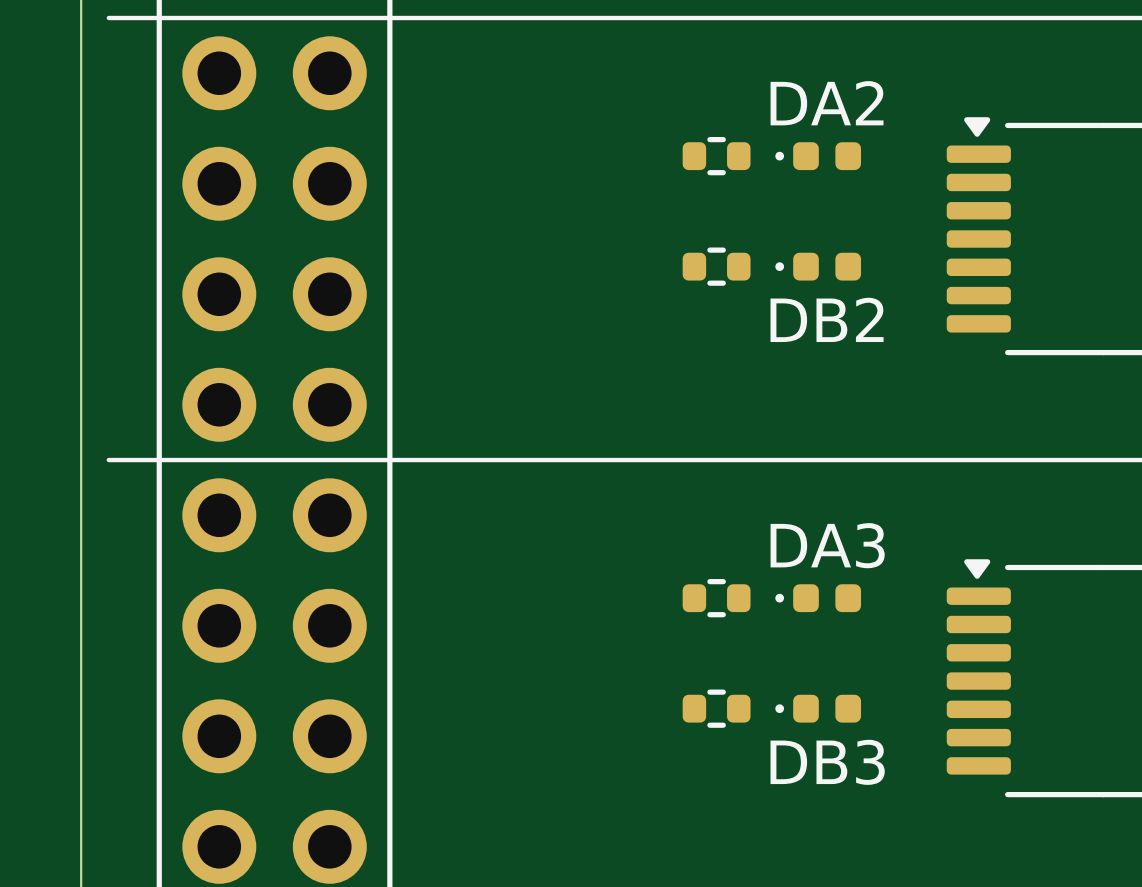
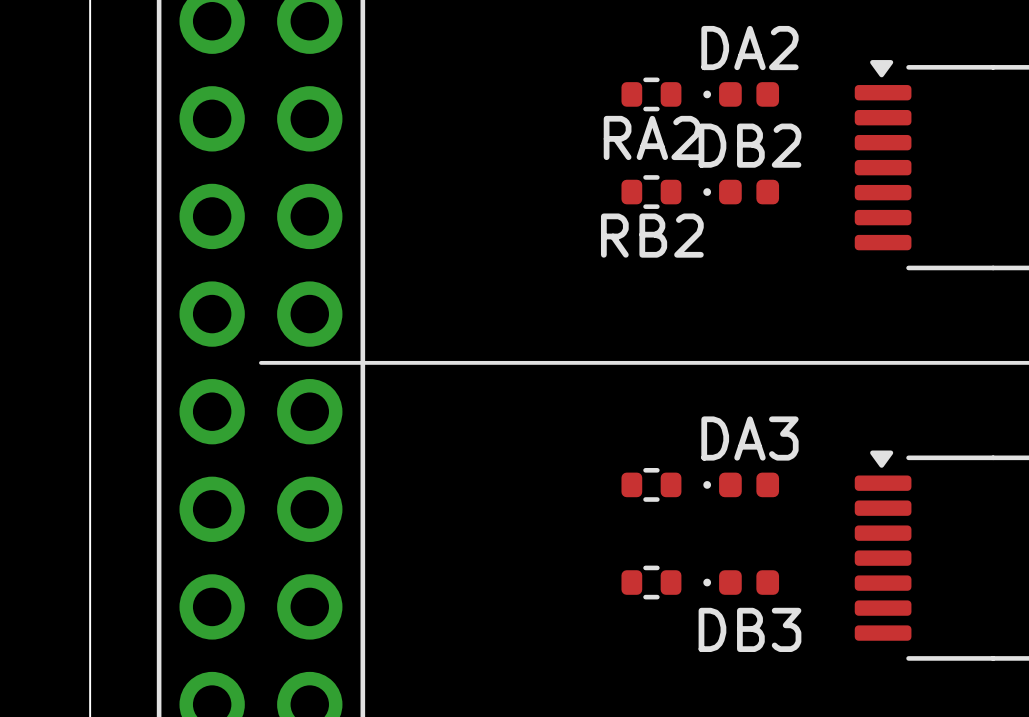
RA2 name: none -> RA2 (652, 137)
RB2 name: none -> RB2 (652, 235)
DB2 name position: DB2 (827, 319) -> DB2 (749, 145)
line: (108, 460) (274, 460) -> none

